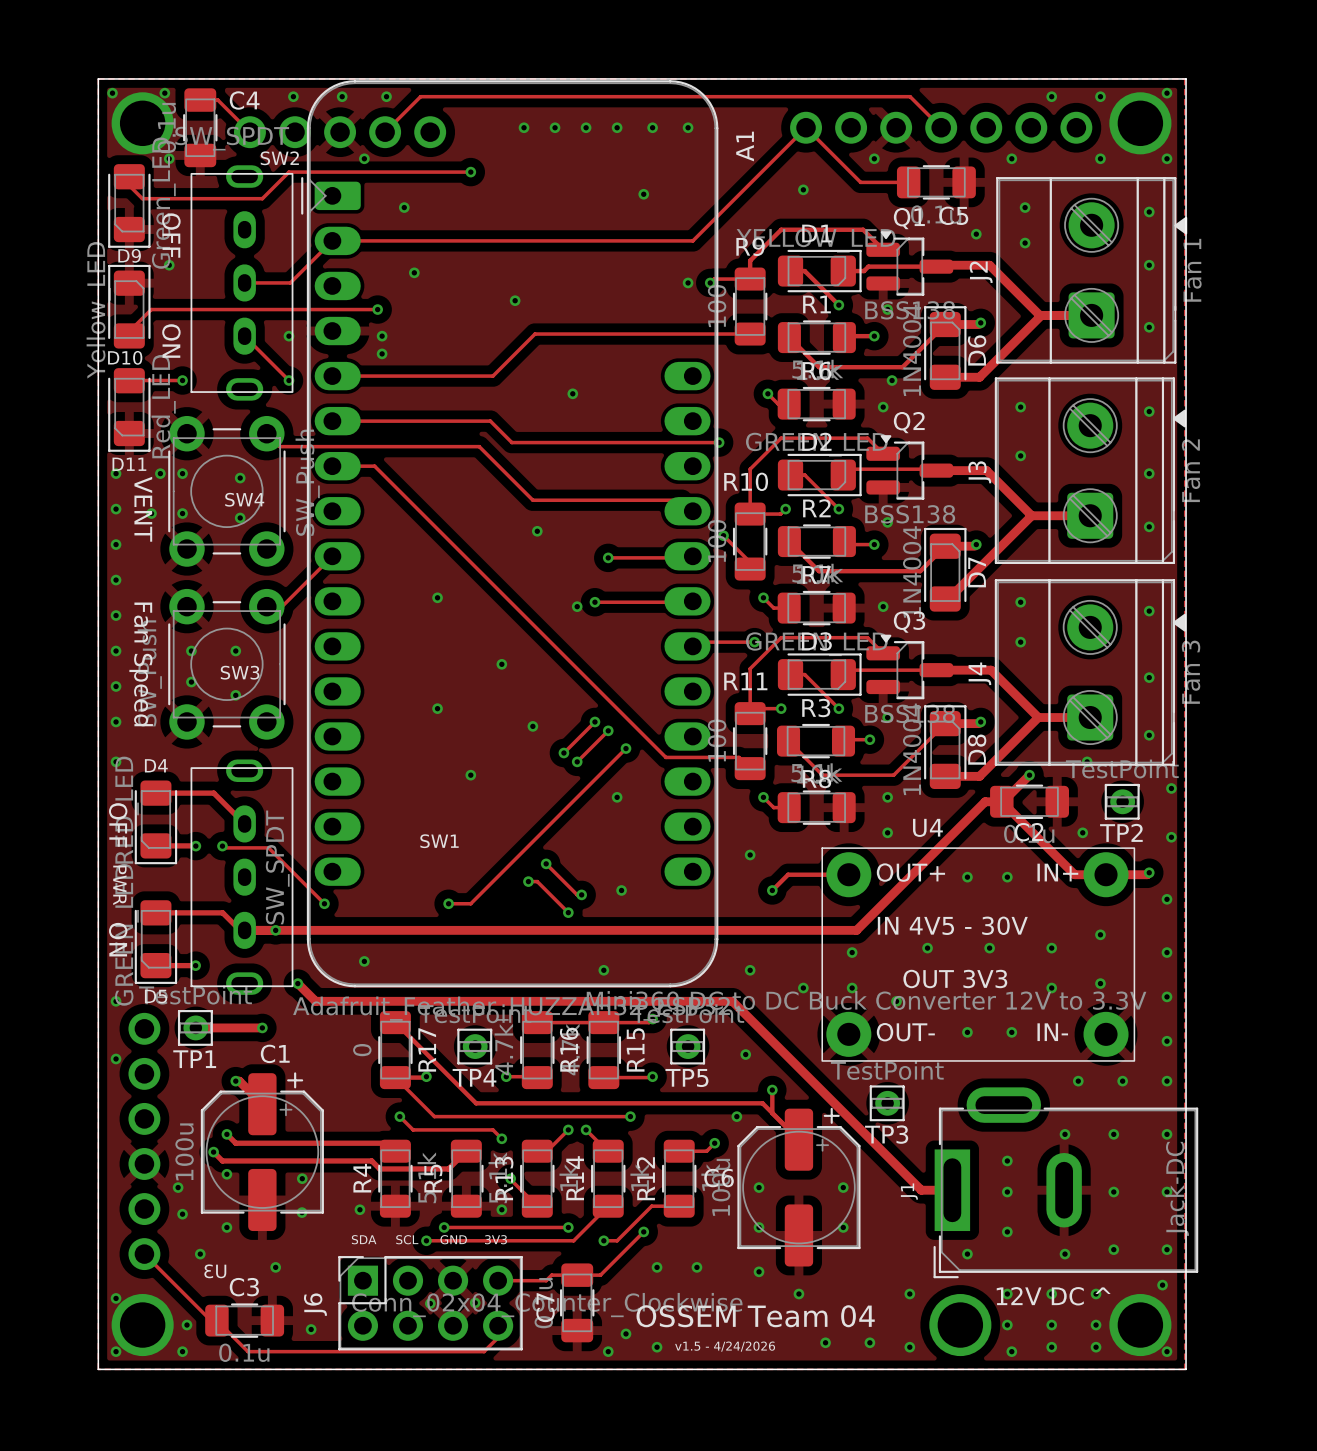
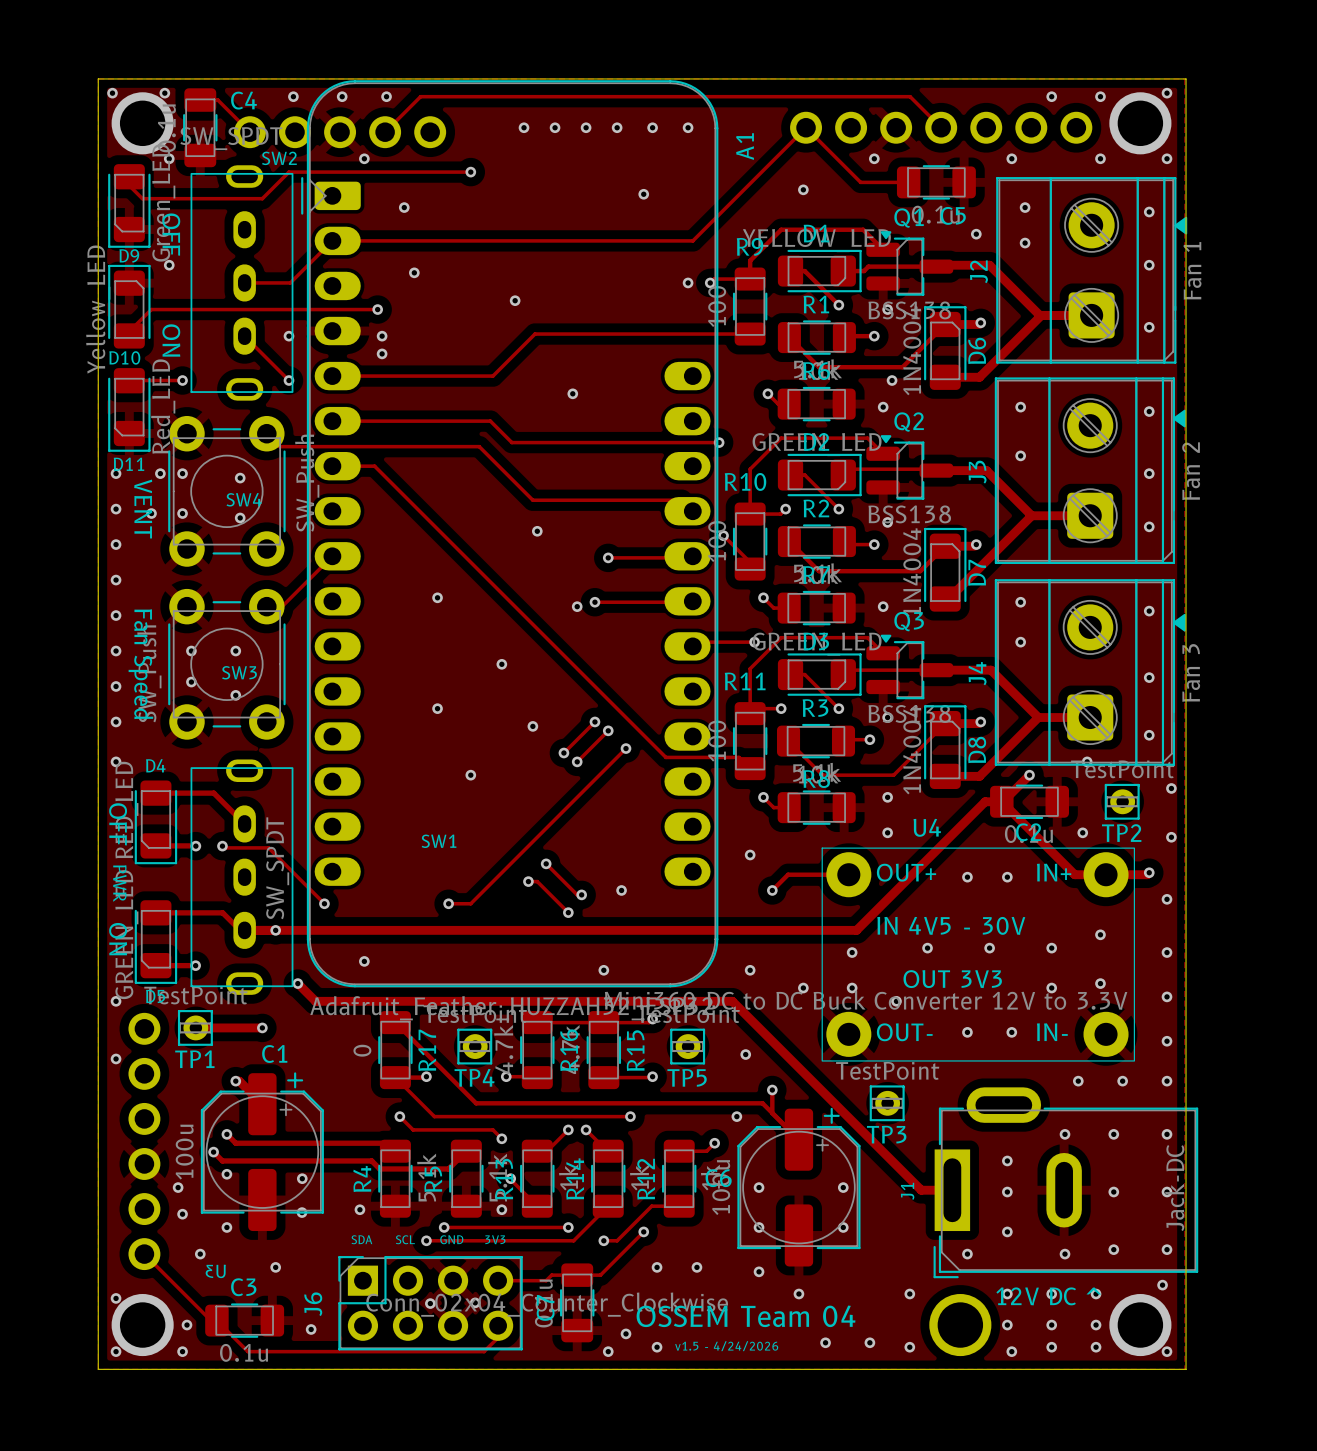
via: (617, 797) -> none

